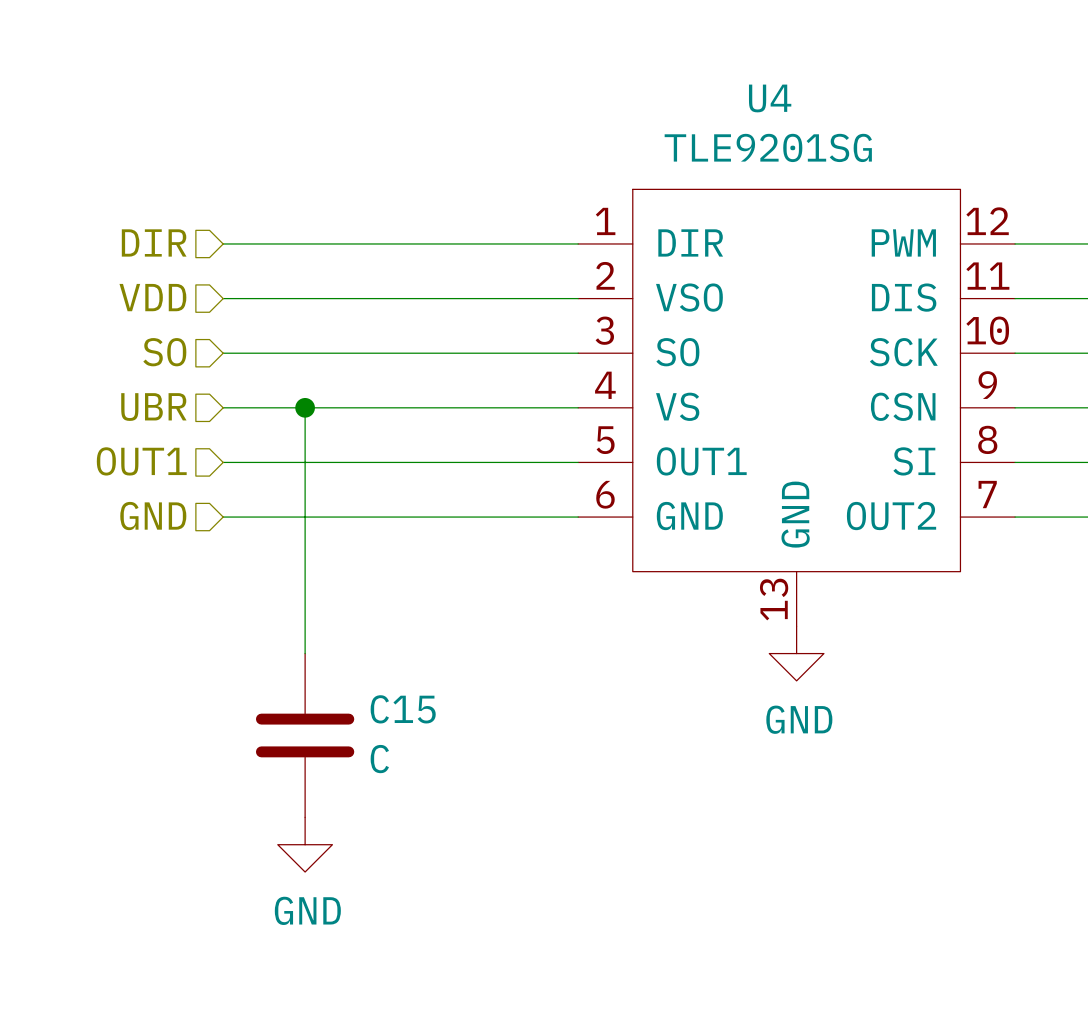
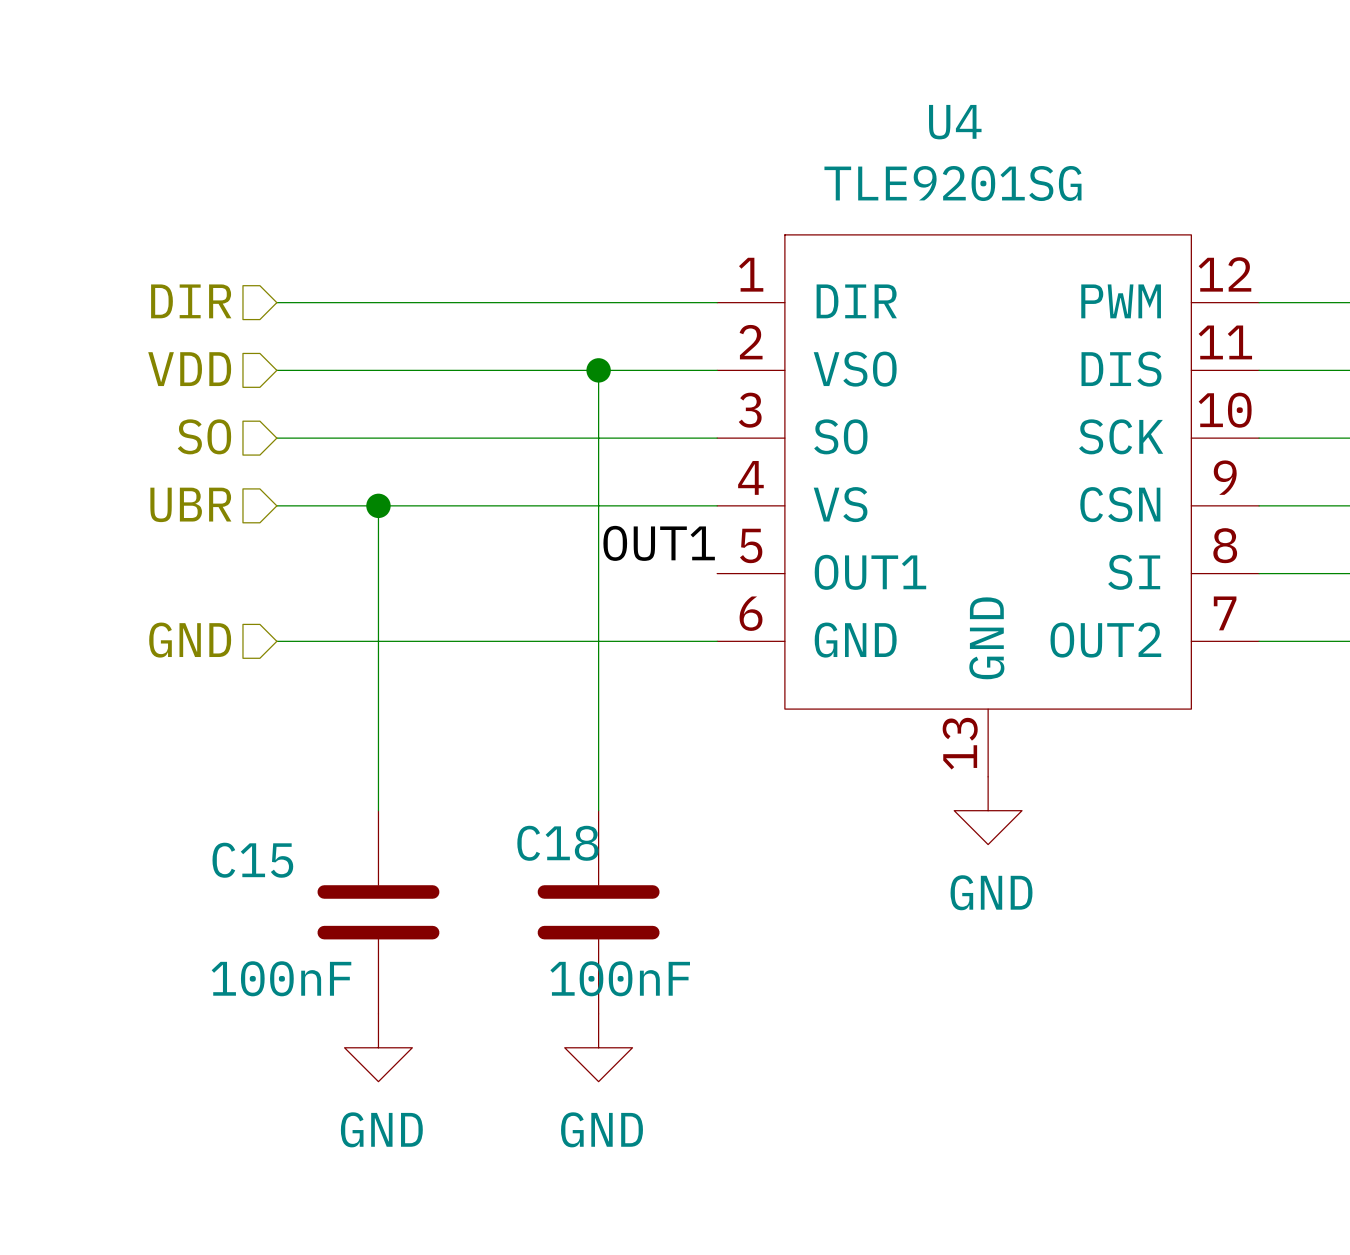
wire: none -> (598, 370) (598, 810)
junction: none -> (598, 370)
label: none -> OUT1 (659, 543)
hierarchical label: OUT1 (141, 461) -> none
wire: (223, 462) (578, 462) -> none
C15 name position: C15 (403, 709) -> C15 (252, 860)
C18: none -> 100nF (598, 912)
C15 value: C (379, 759) -> 100nF (281, 978)
power symbol: none -> GND (598, 1047)

